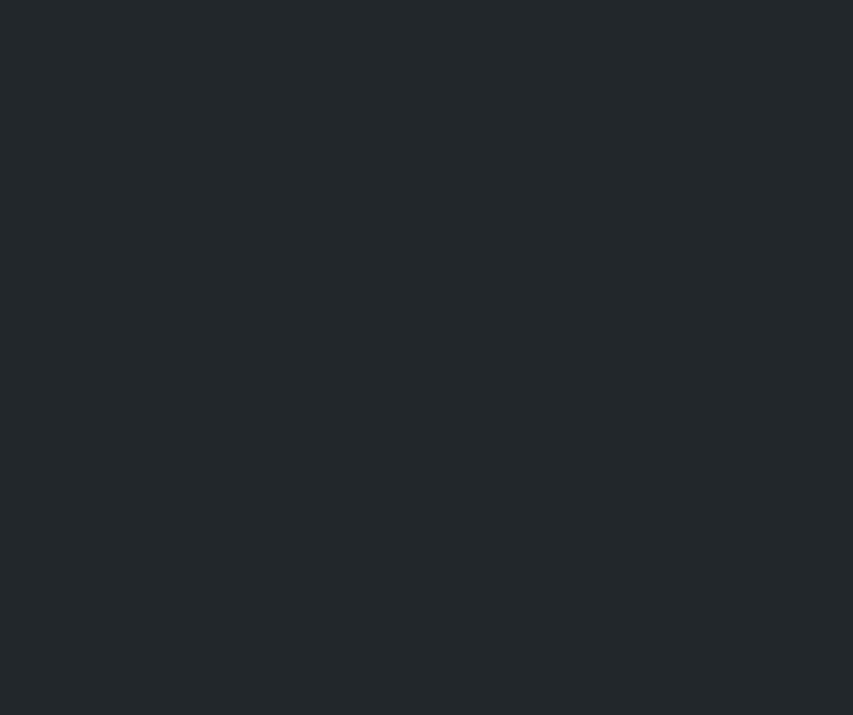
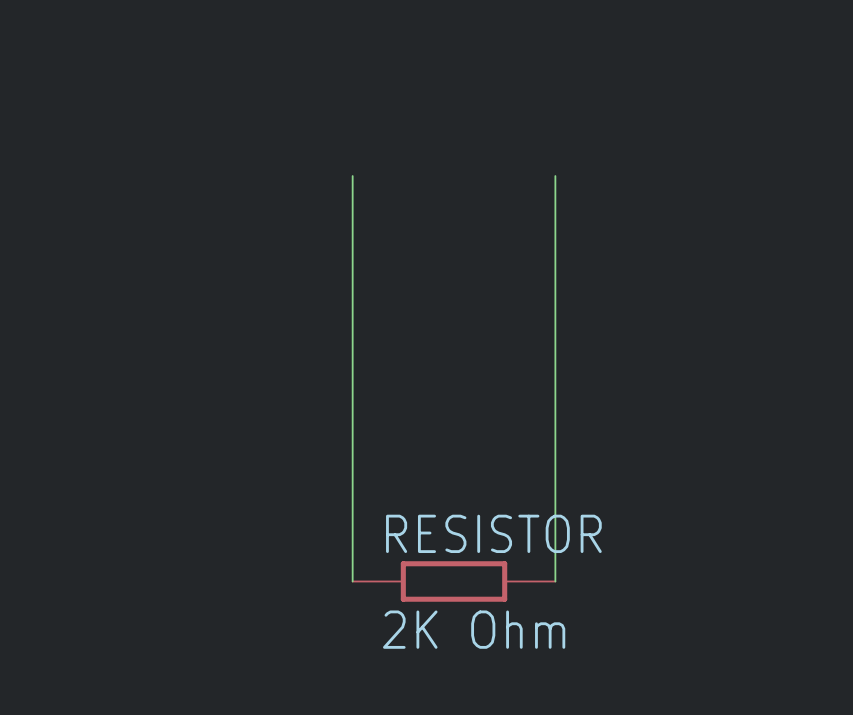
wire: none -> (352, 176) (352, 581)
wire: none -> (555, 176) (555, 581)
RESISTOR: none -> 2K Ohm (454, 581)

